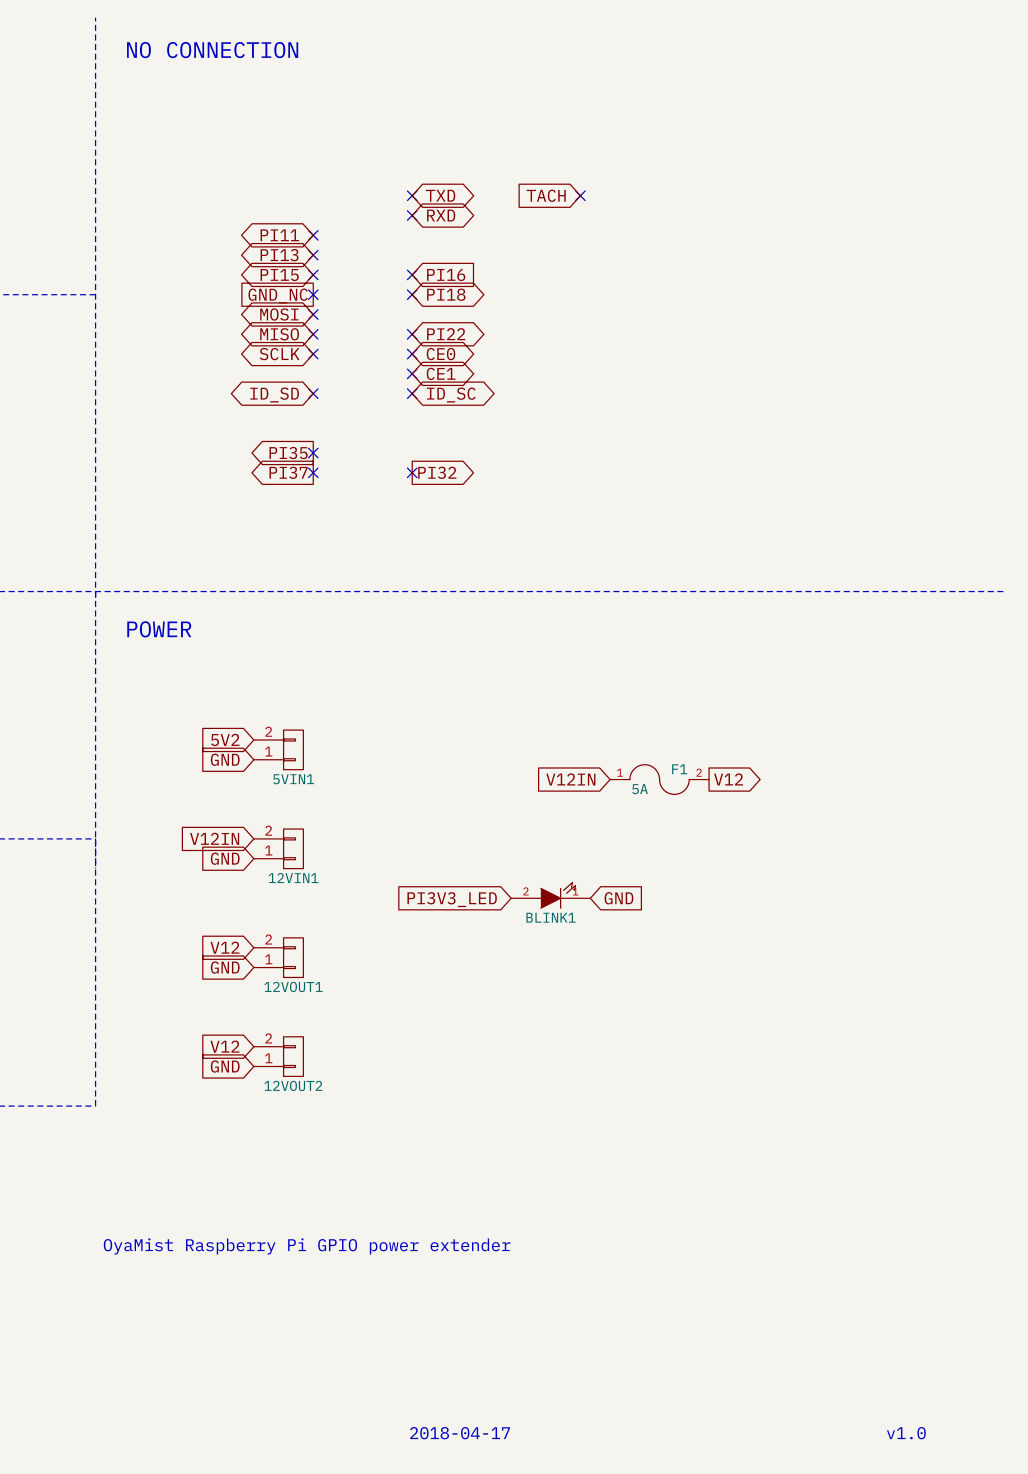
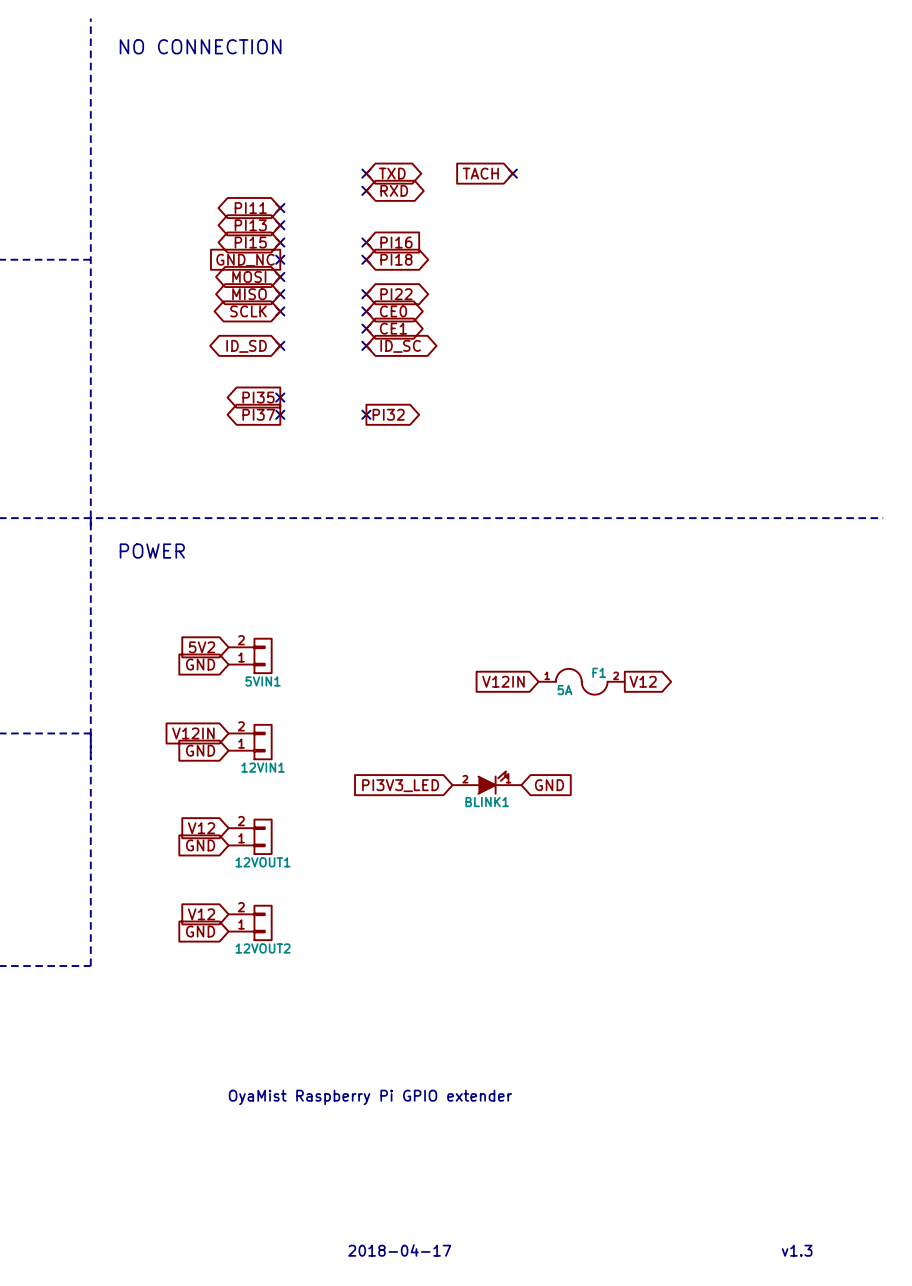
text: OyaMist Raspberry Pi GPIO power extender (307, 1246) -> OyaMist Raspberry Pi GPIO extender (370, 1097)
text: v1.0 (906, 1433) -> v1.3 (797, 1250)

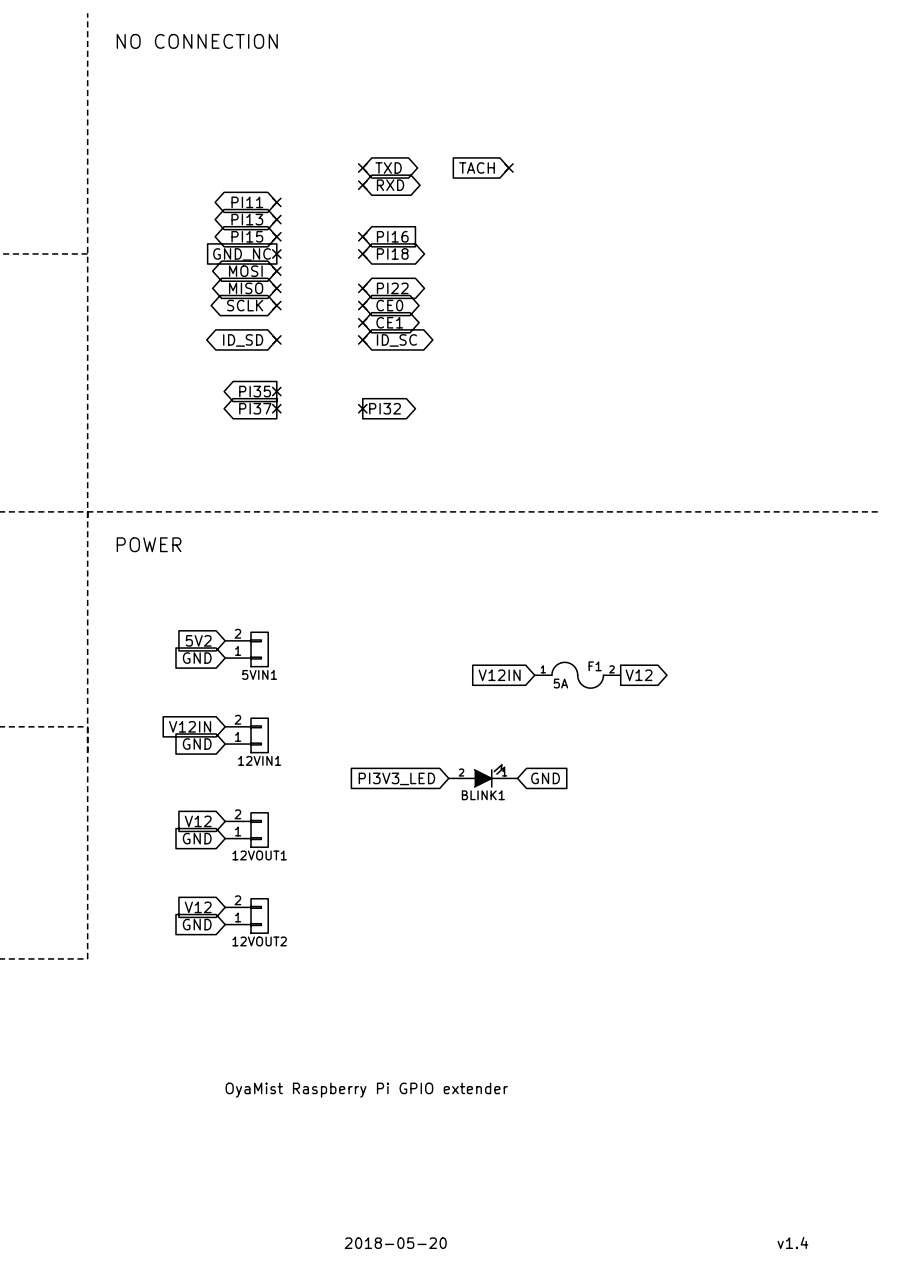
text: 2018-04-17 (399, 1250) -> 2018-05-20 (395, 1243)
text: v1.3 (797, 1250) -> v1.4 (792, 1242)

